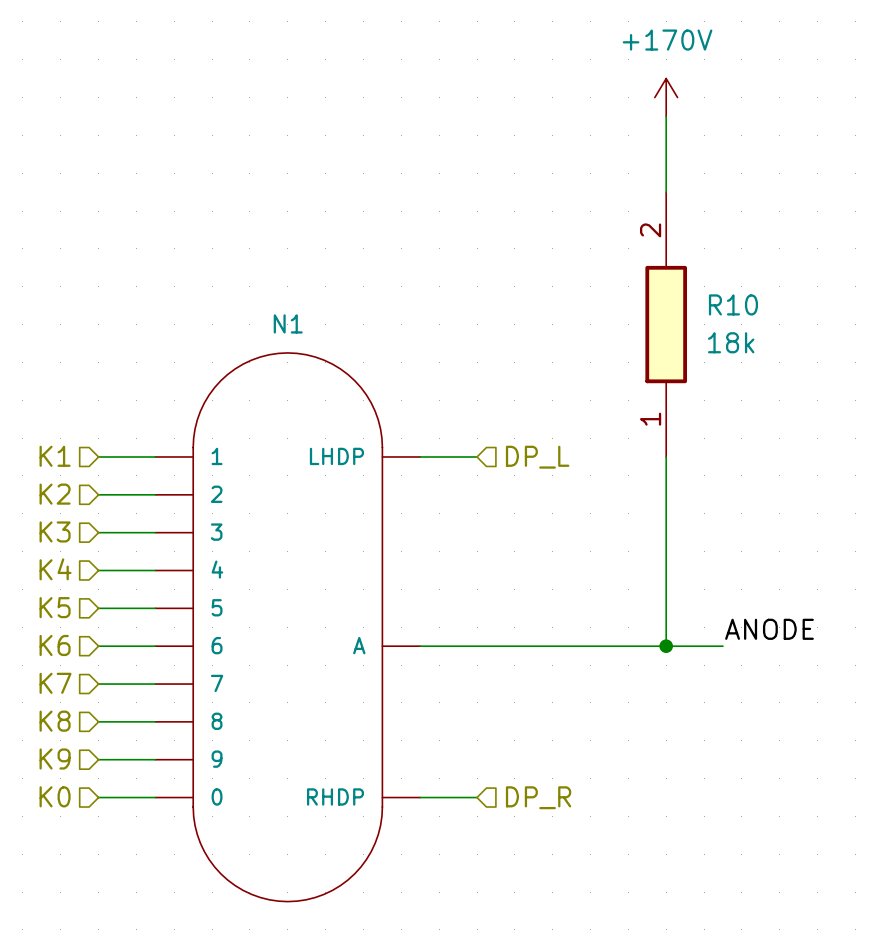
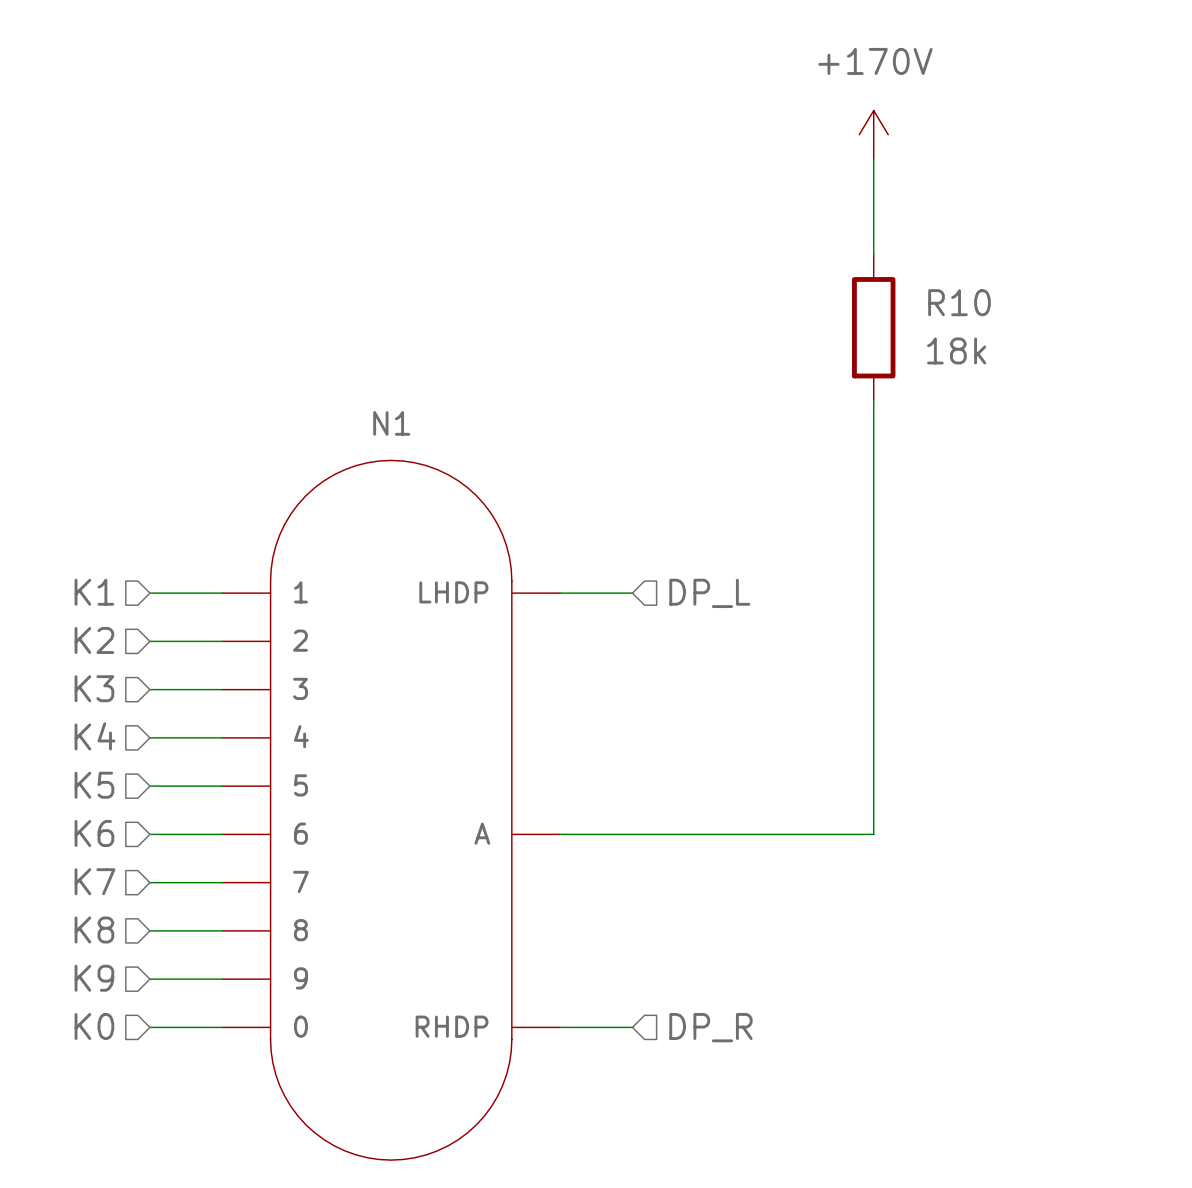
R10 symbol: [645, 192, 688, 457] -> [852, 255, 896, 401]
label: ANODE (769, 629) -> none
wire: (666, 646) (722, 646) -> none
junction: (666, 646) -> none

